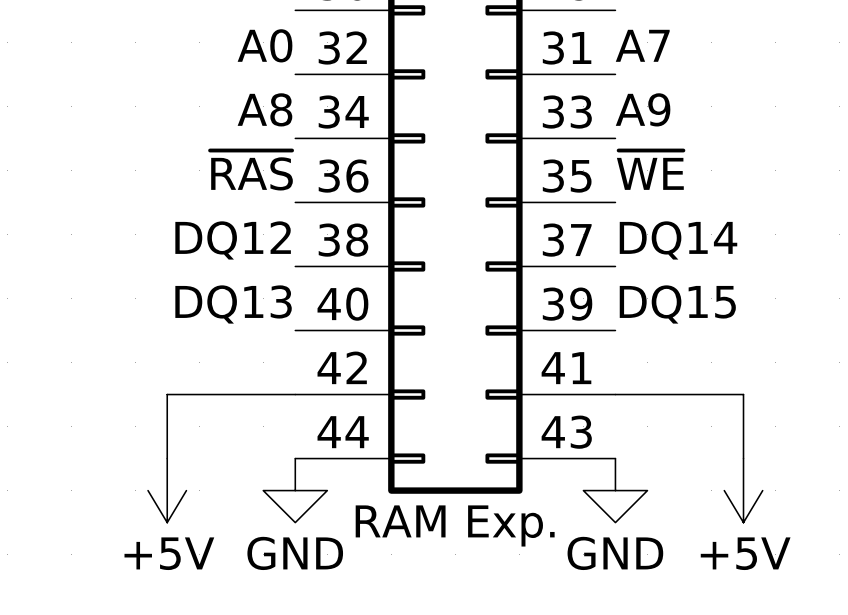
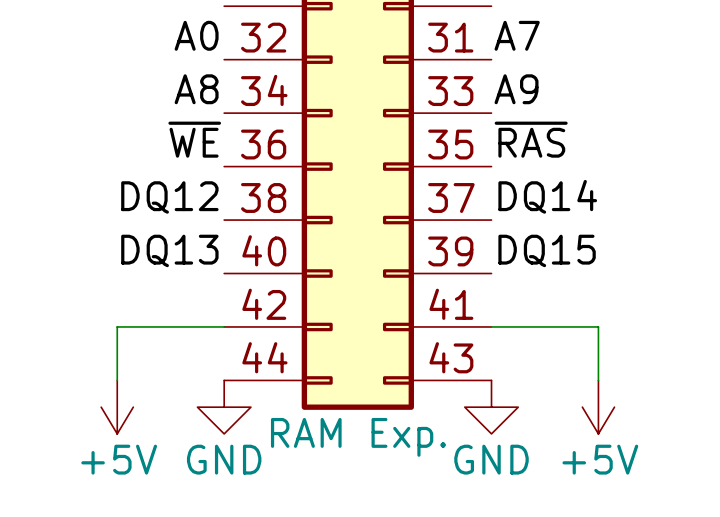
label: ~{RAS} (251, 170) -> ~{WE} (194, 139)
label: ~{WE} (650, 170) -> ~{RAS} (531, 139)

